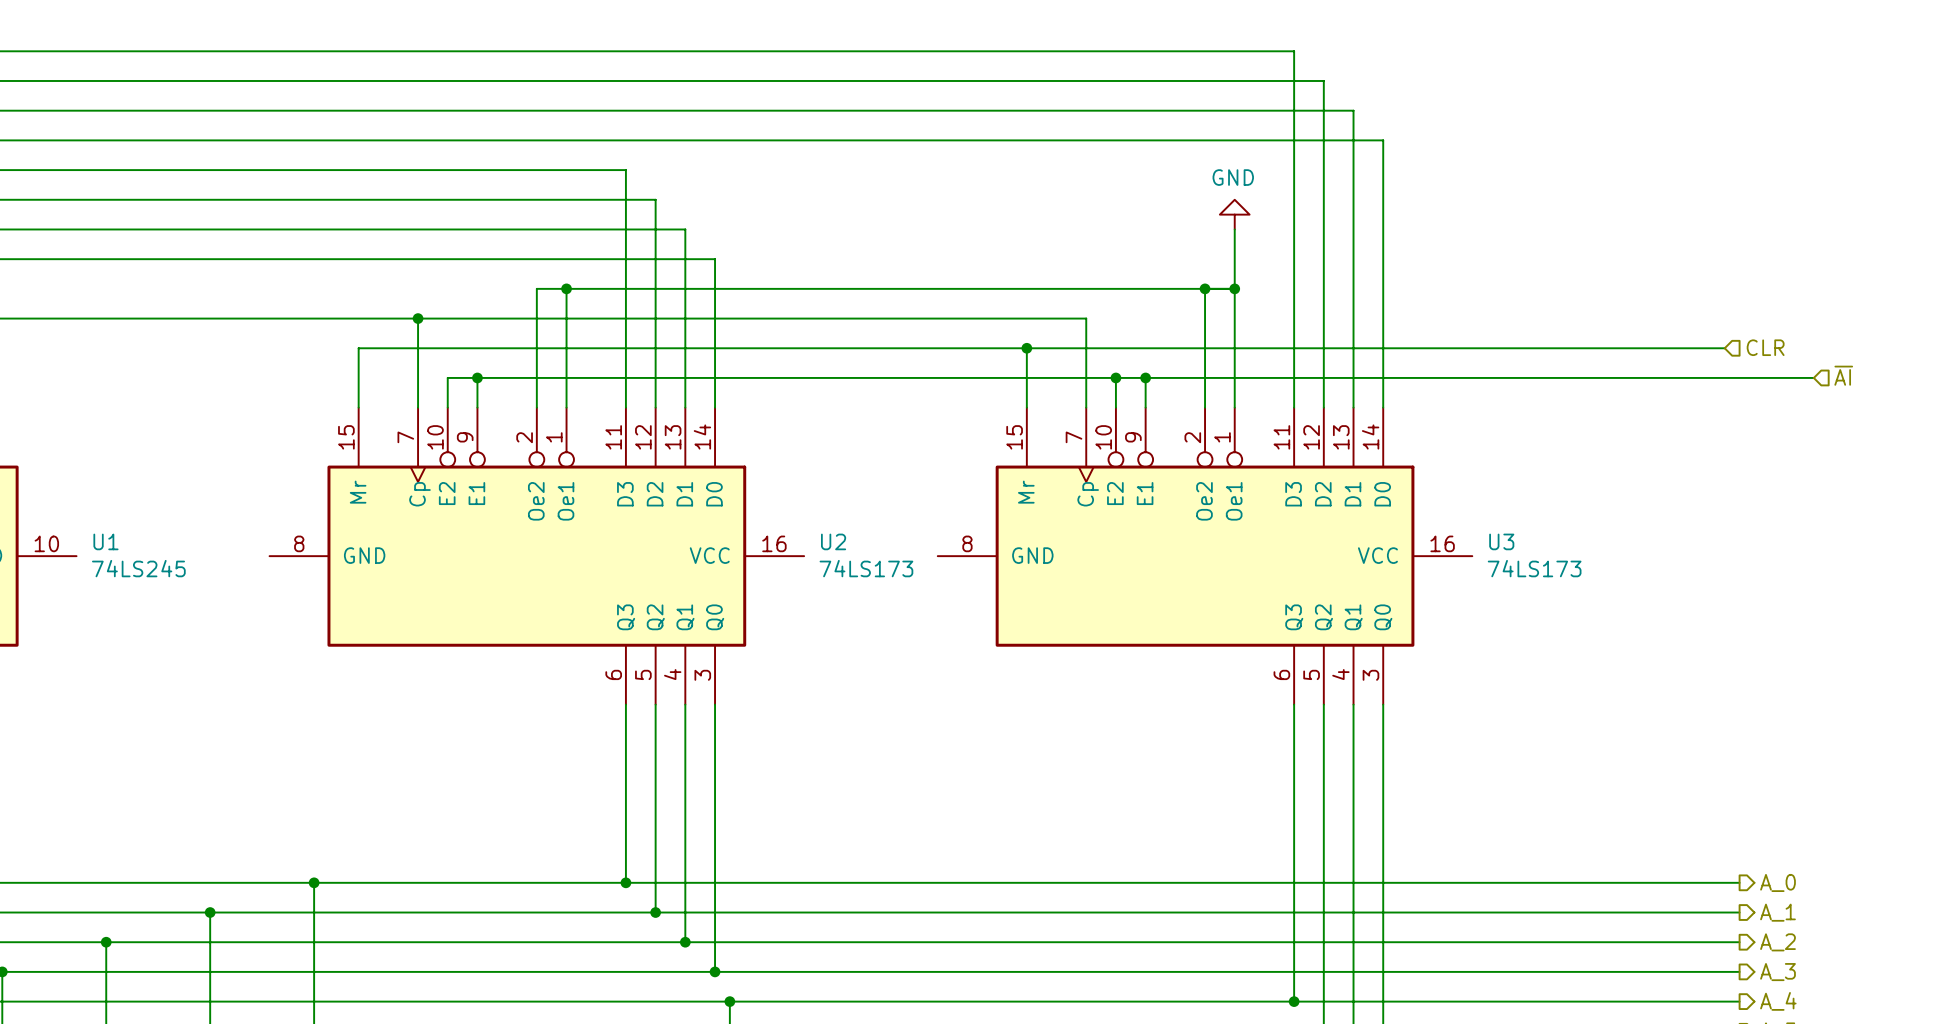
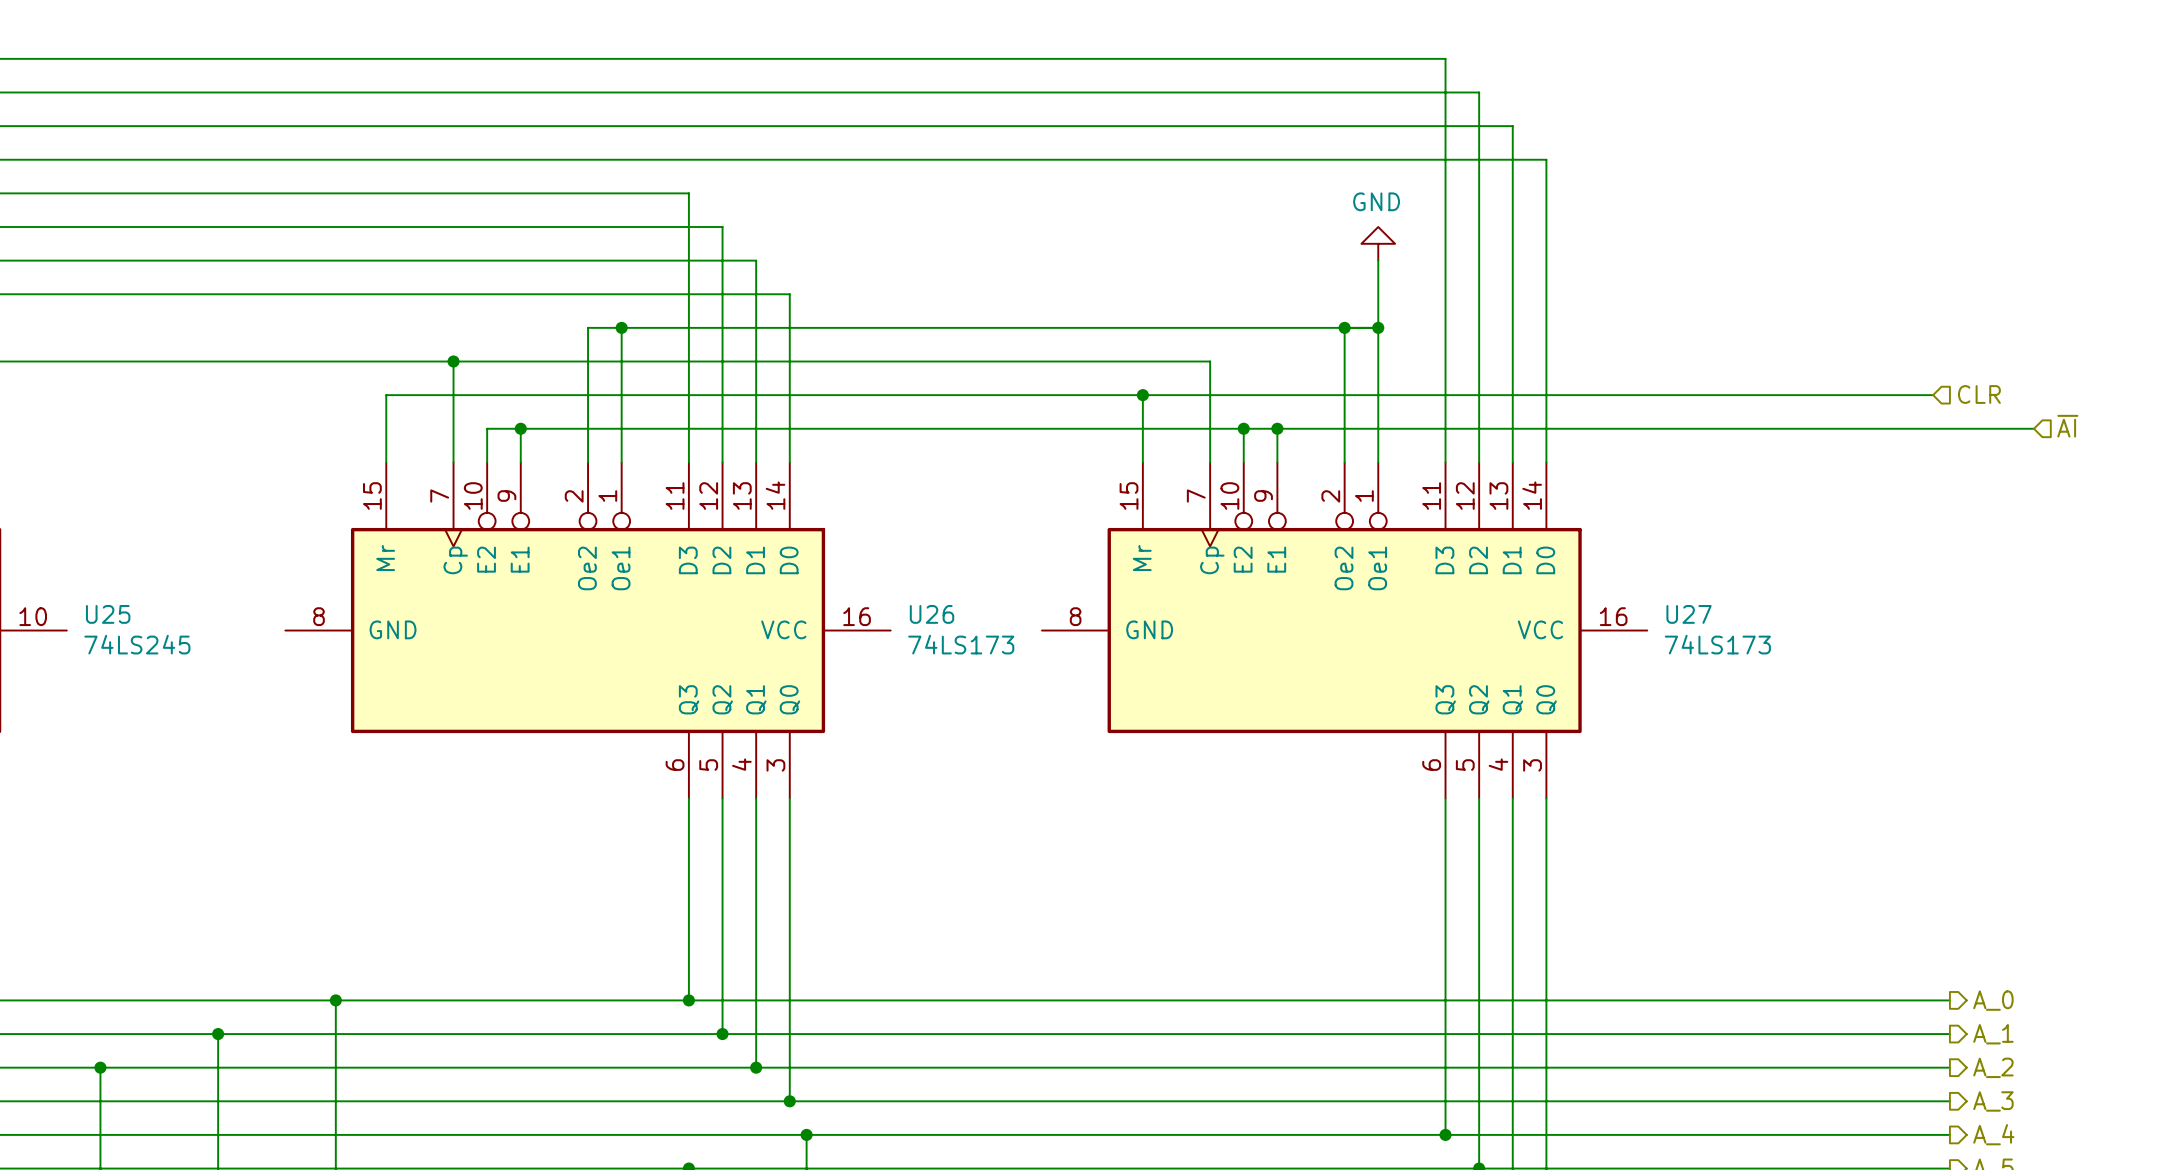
U1 name: U1 (105, 541) -> U25 (108, 614)
U2 name: U2 (833, 541) -> U26 (932, 614)
U3 name: U3 (1501, 541) -> U27 (1689, 614)

